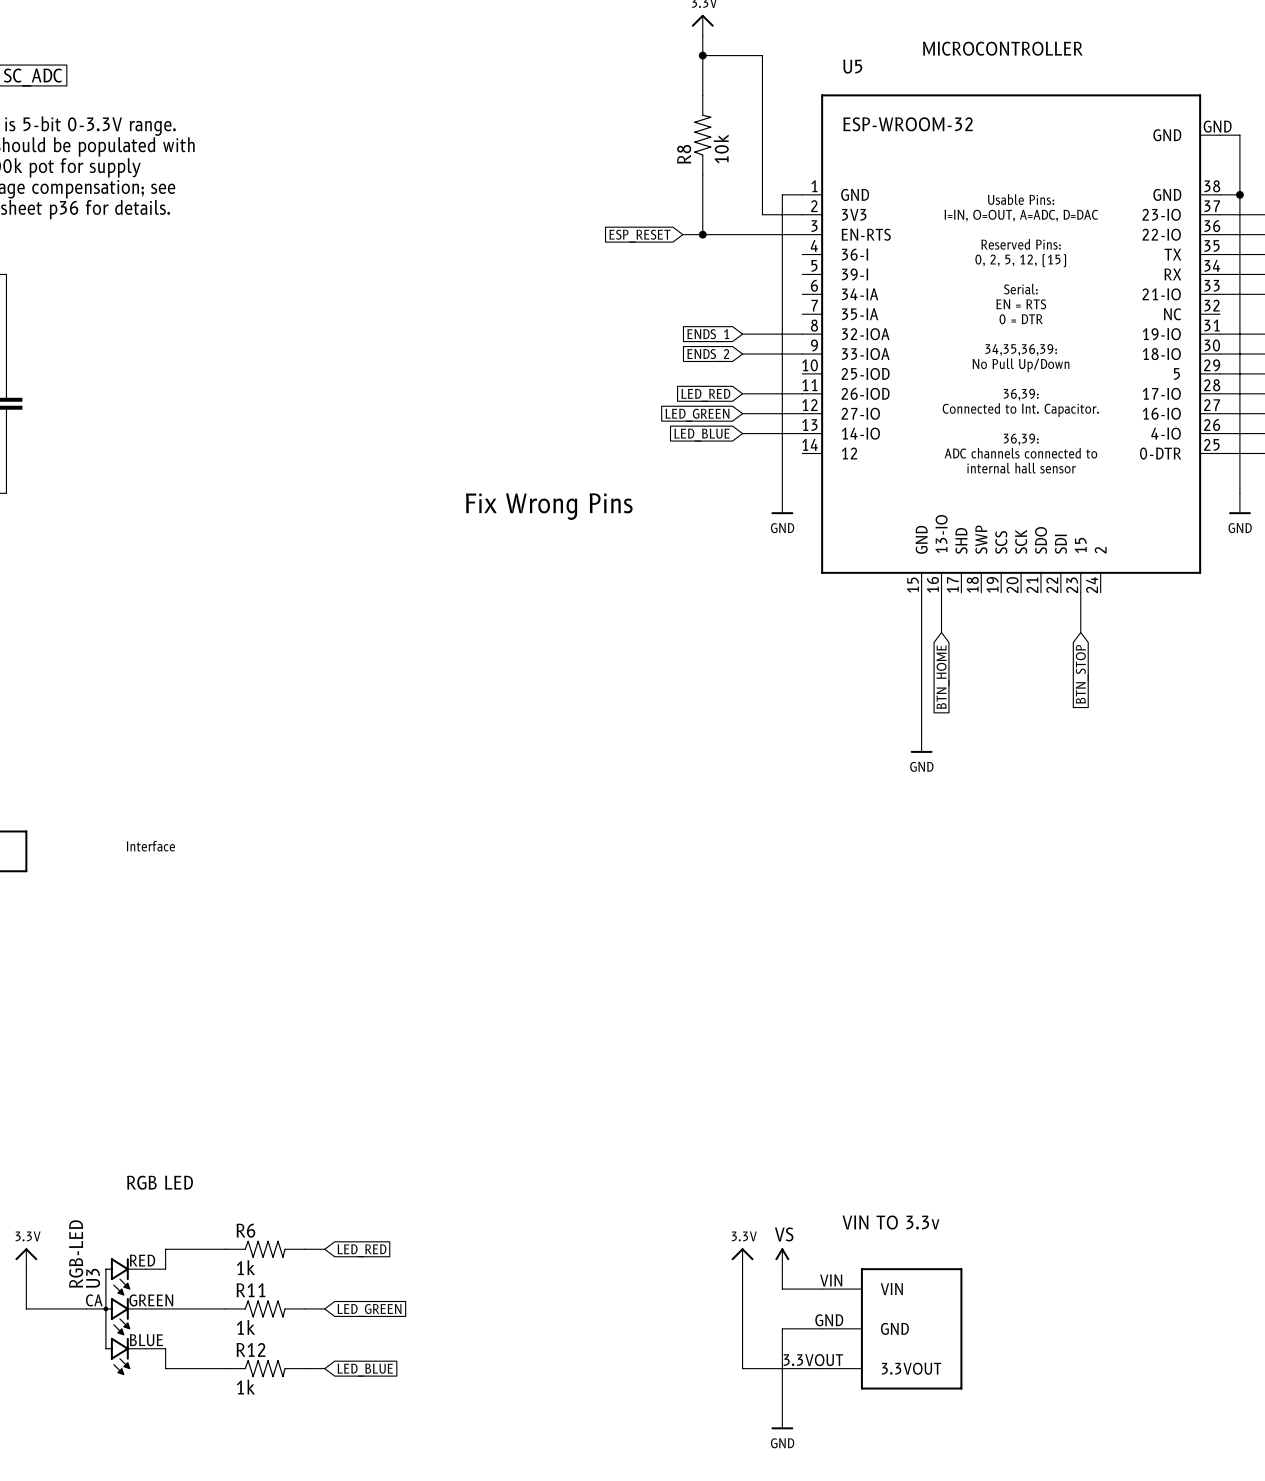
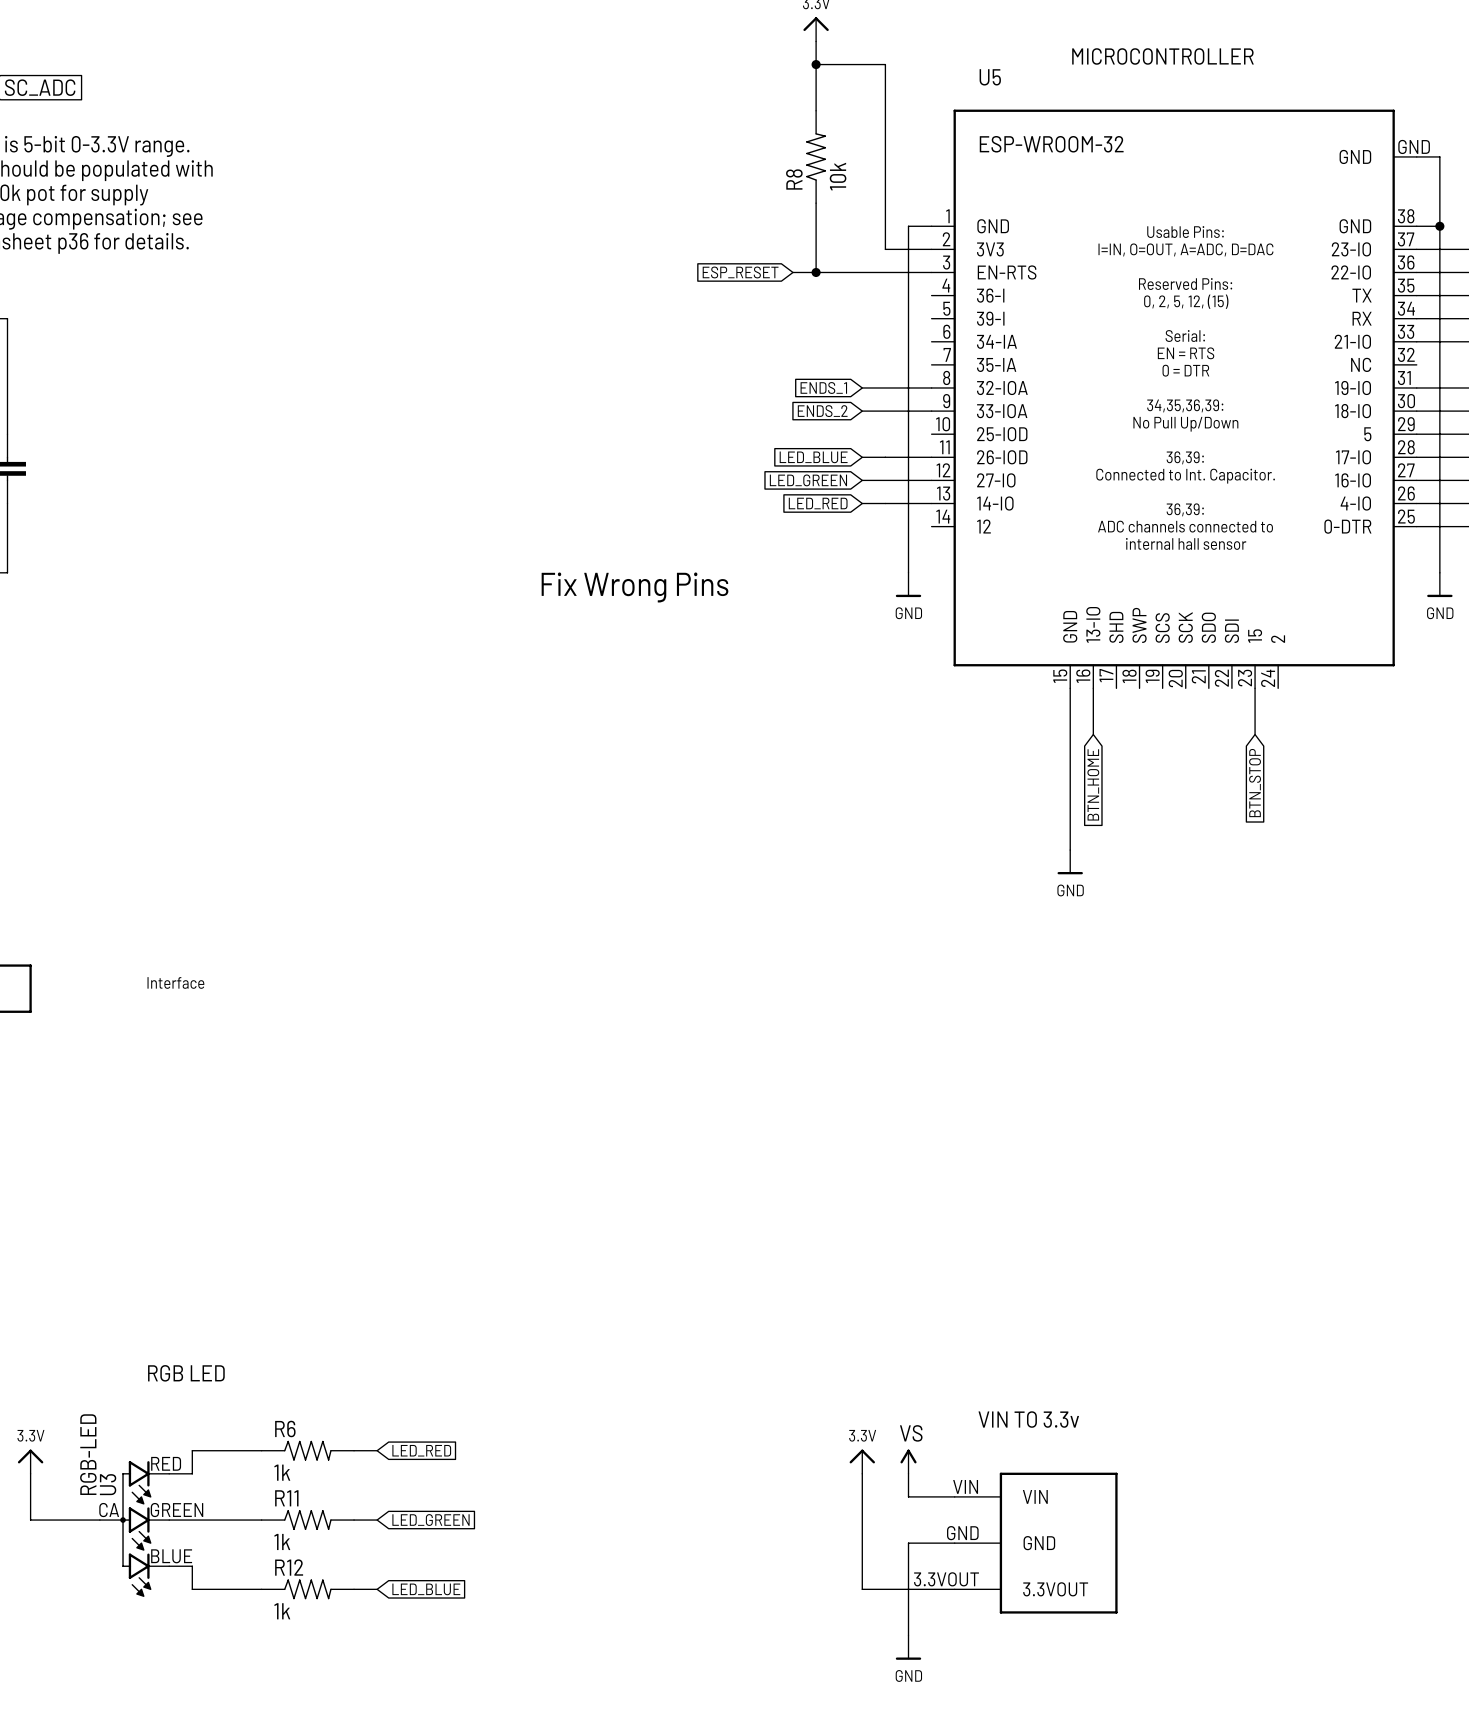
global label: LED_RED (705, 395) -> LED_BLUE (813, 457)
global label: LED_BLUE (702, 435) -> LED_RED (818, 503)

